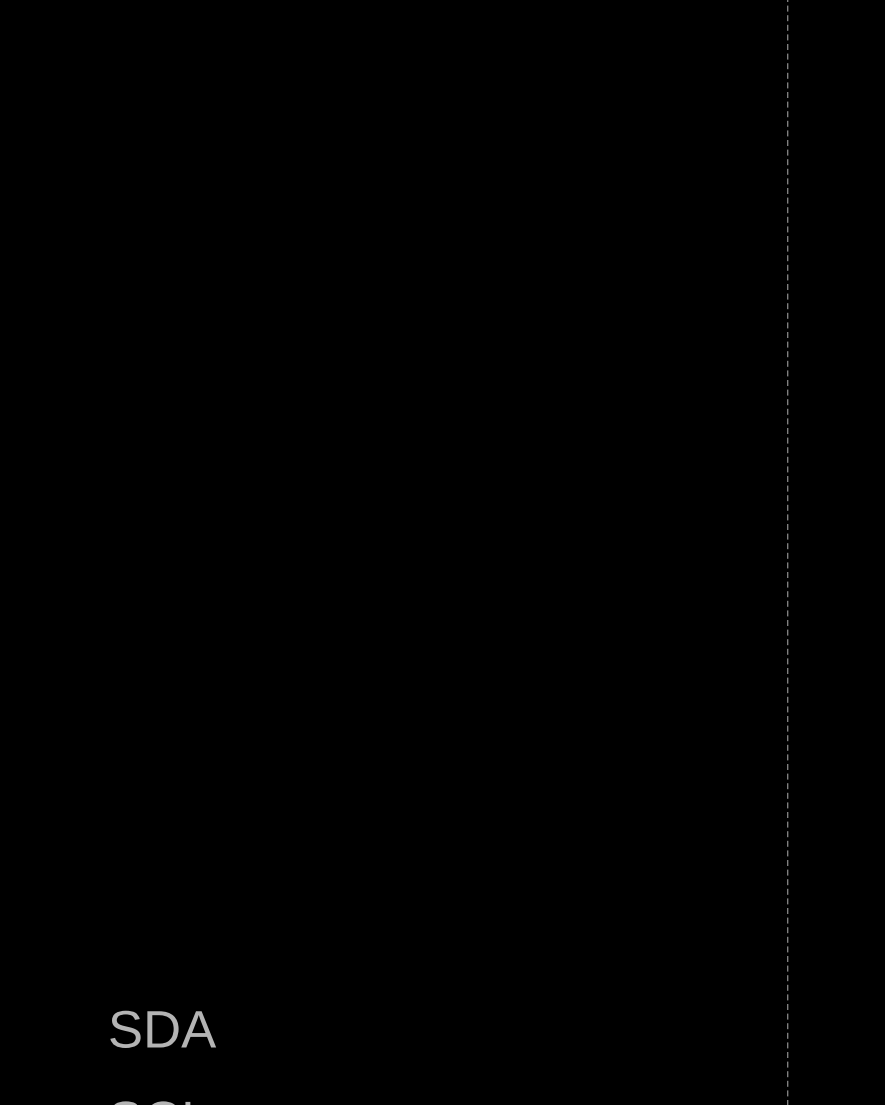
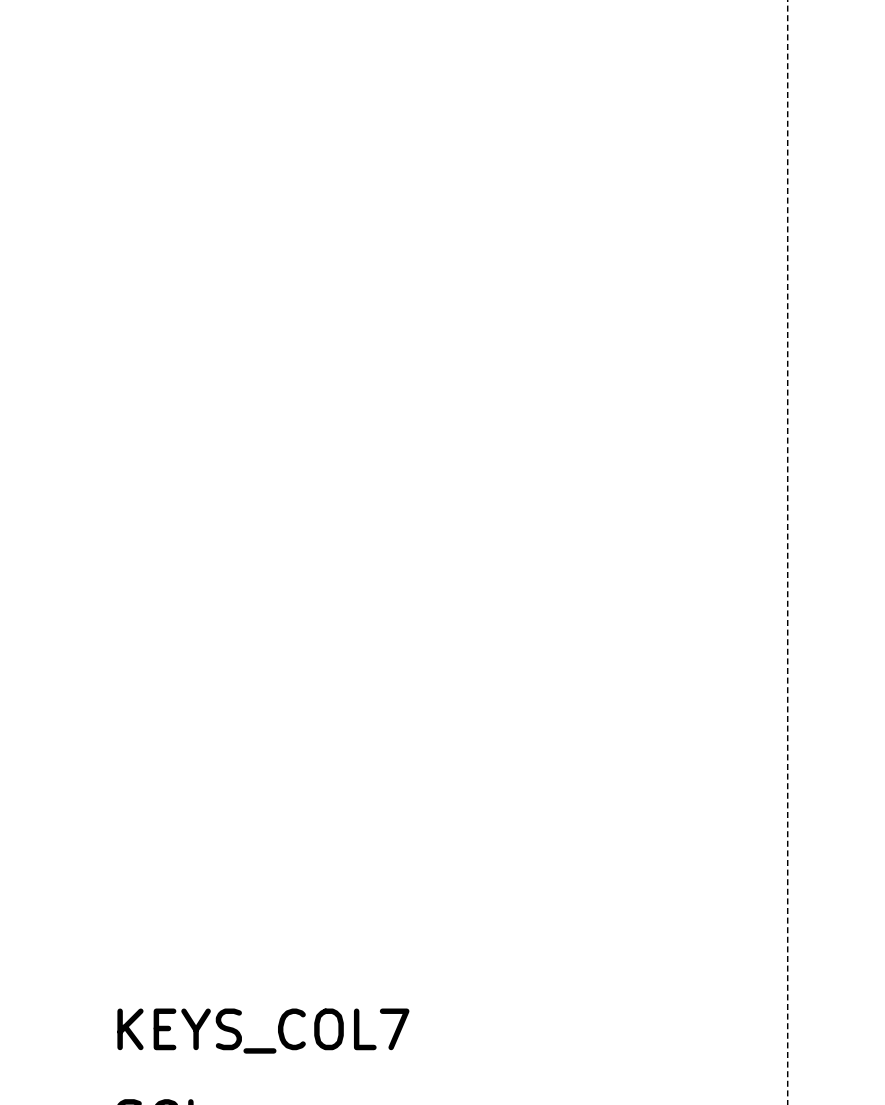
label: SDA (163, 1029) -> KEYS_COL7 (263, 1031)

